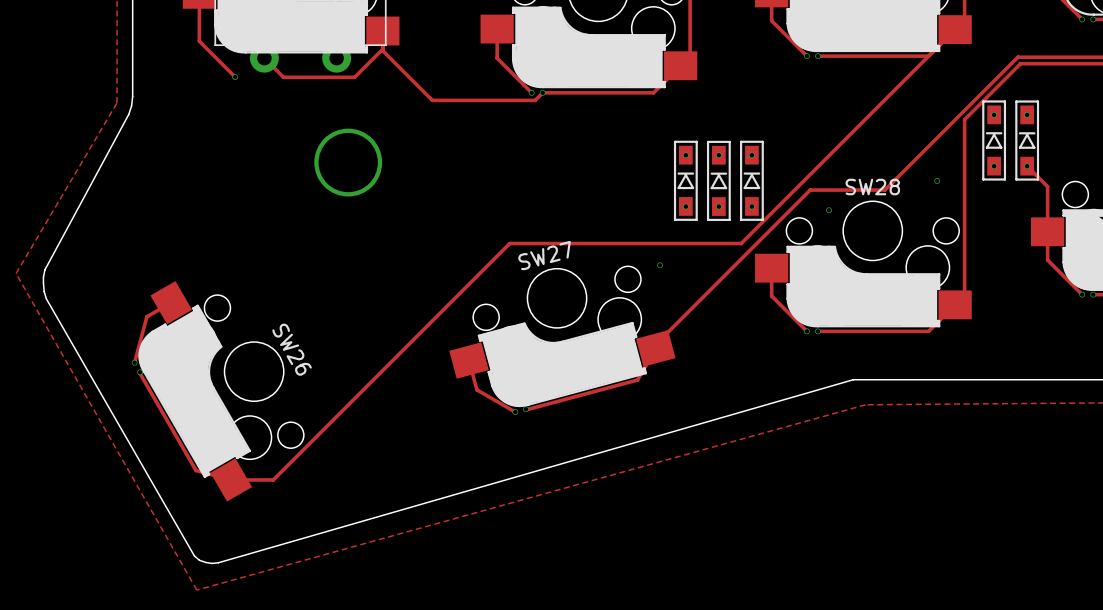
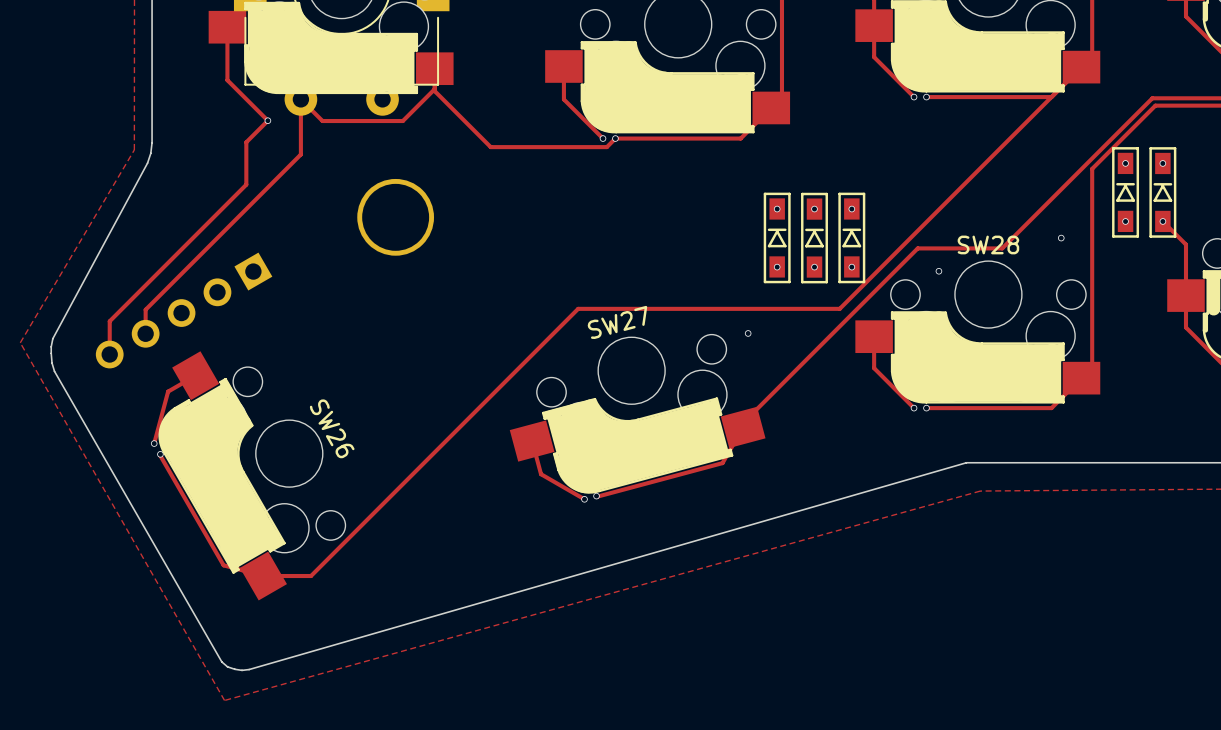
track: none -> (300, 99) (300, 154) (145, 309) (145, 333)
track: none -> (267, 120) (246, 142) (246, 184) (109, 321) (109, 354)
part: none -> (184, 310)

